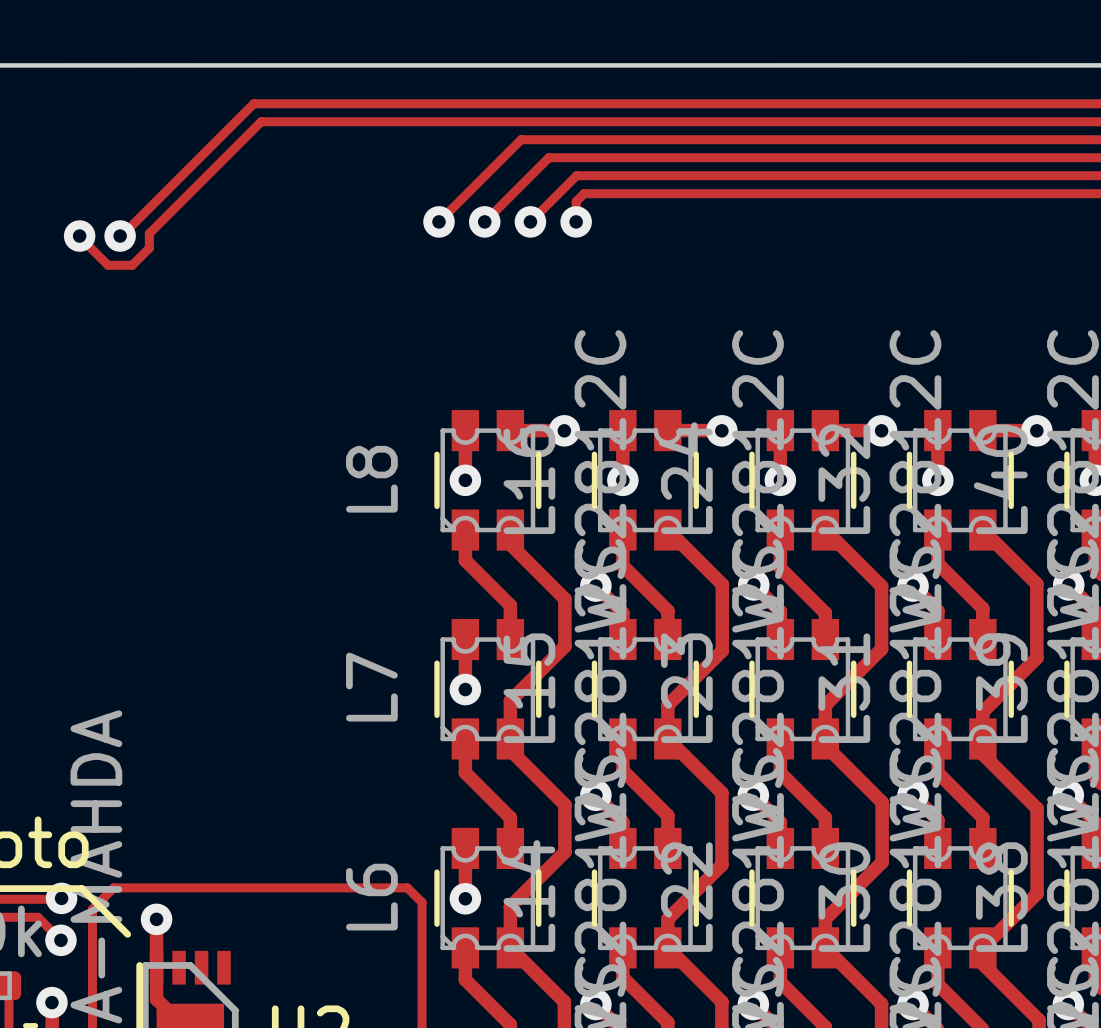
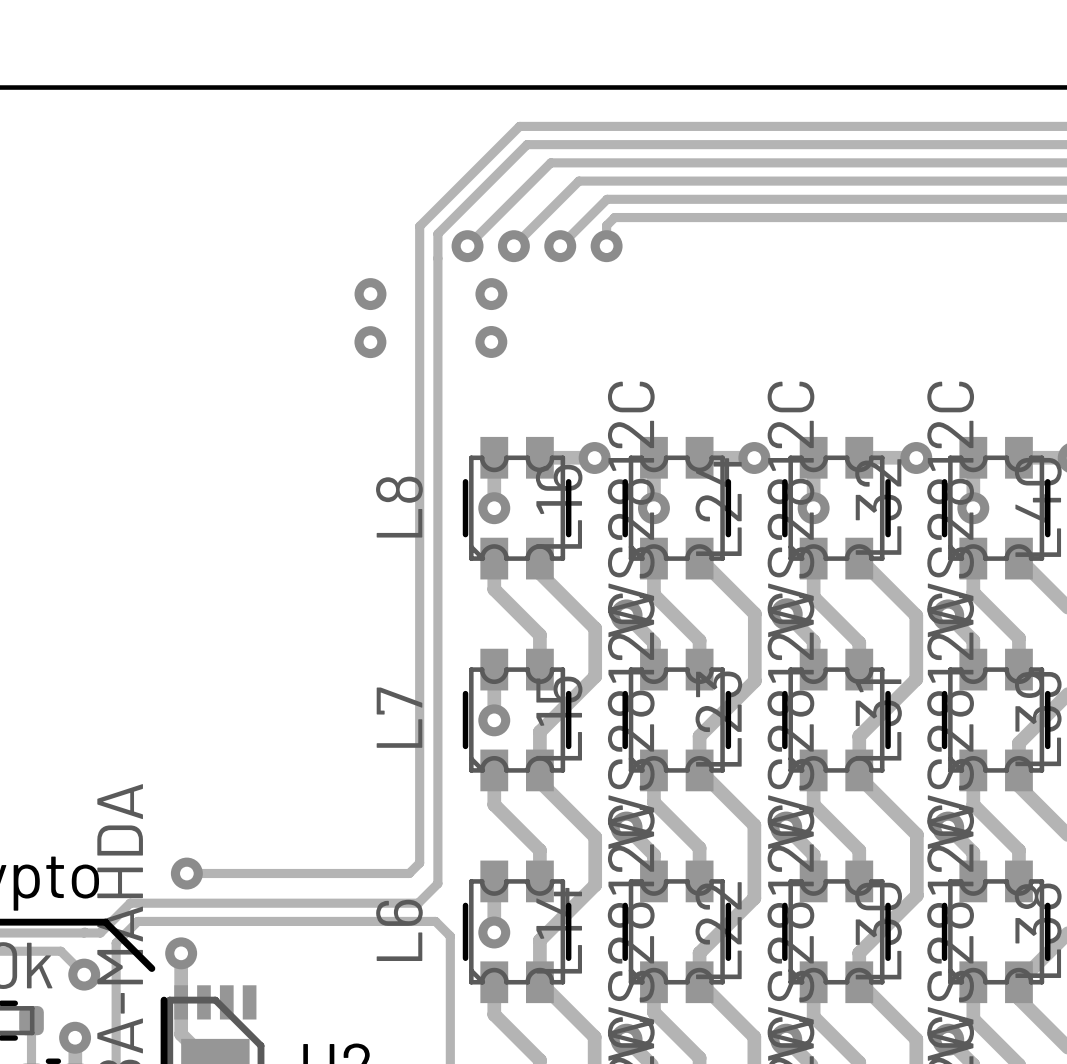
track: (490, 103) (253, 103) (120, 236) -> (519, 126) (419, 226) (419, 863) (409, 873) (186, 873)
track: (497, 121) (261, 121) (149, 233) (149, 248) (132, 265) (108, 265) (79, 236) -> (527, 144) (437, 233) (437, 883) (418, 903) (130, 903) (100, 932) (83, 932)
via: (79, 236) -> none
via: (120, 236) -> none
via: none -> (370, 294)
via: none -> (491, 294)
via: none -> (370, 342)
via: none -> (491, 341)
via position: (61, 898) -> (186, 873)

